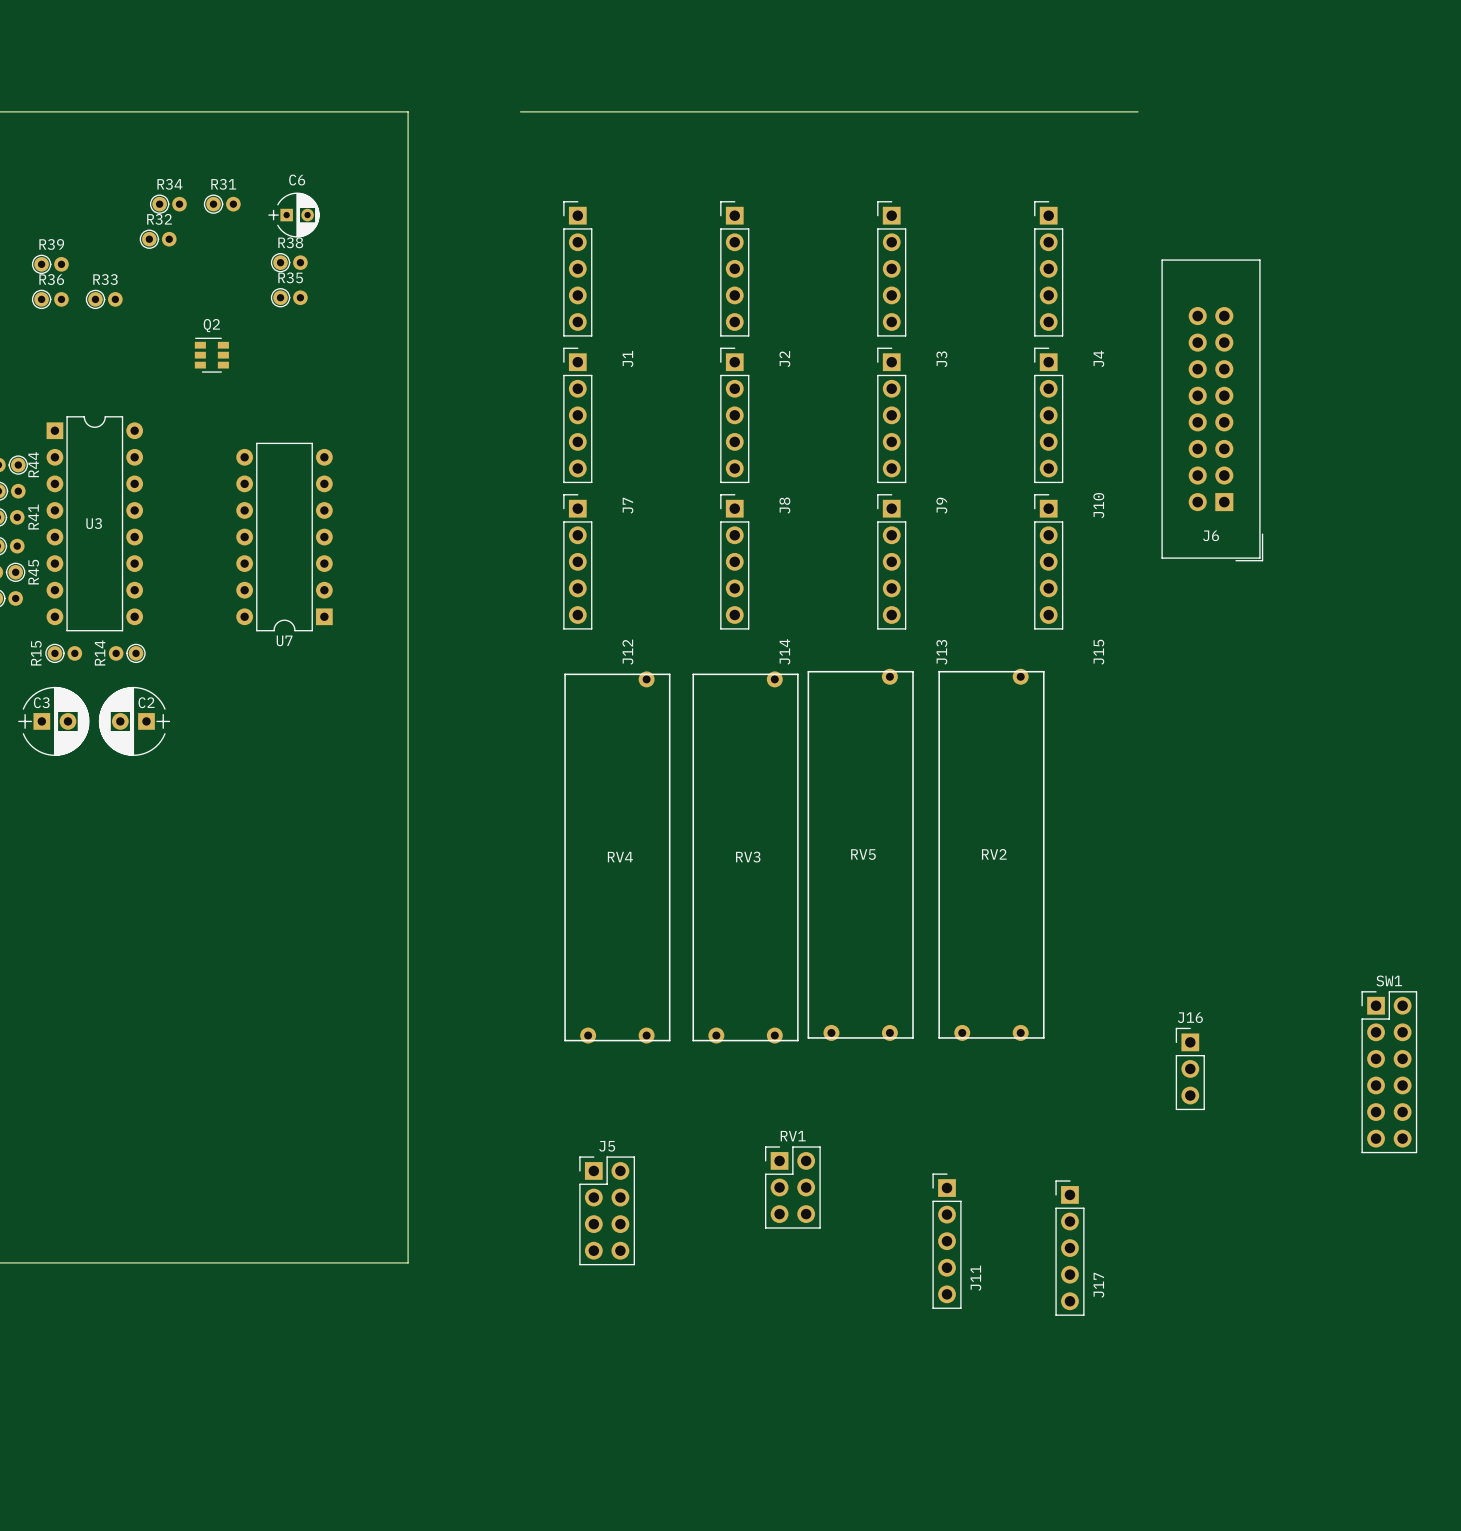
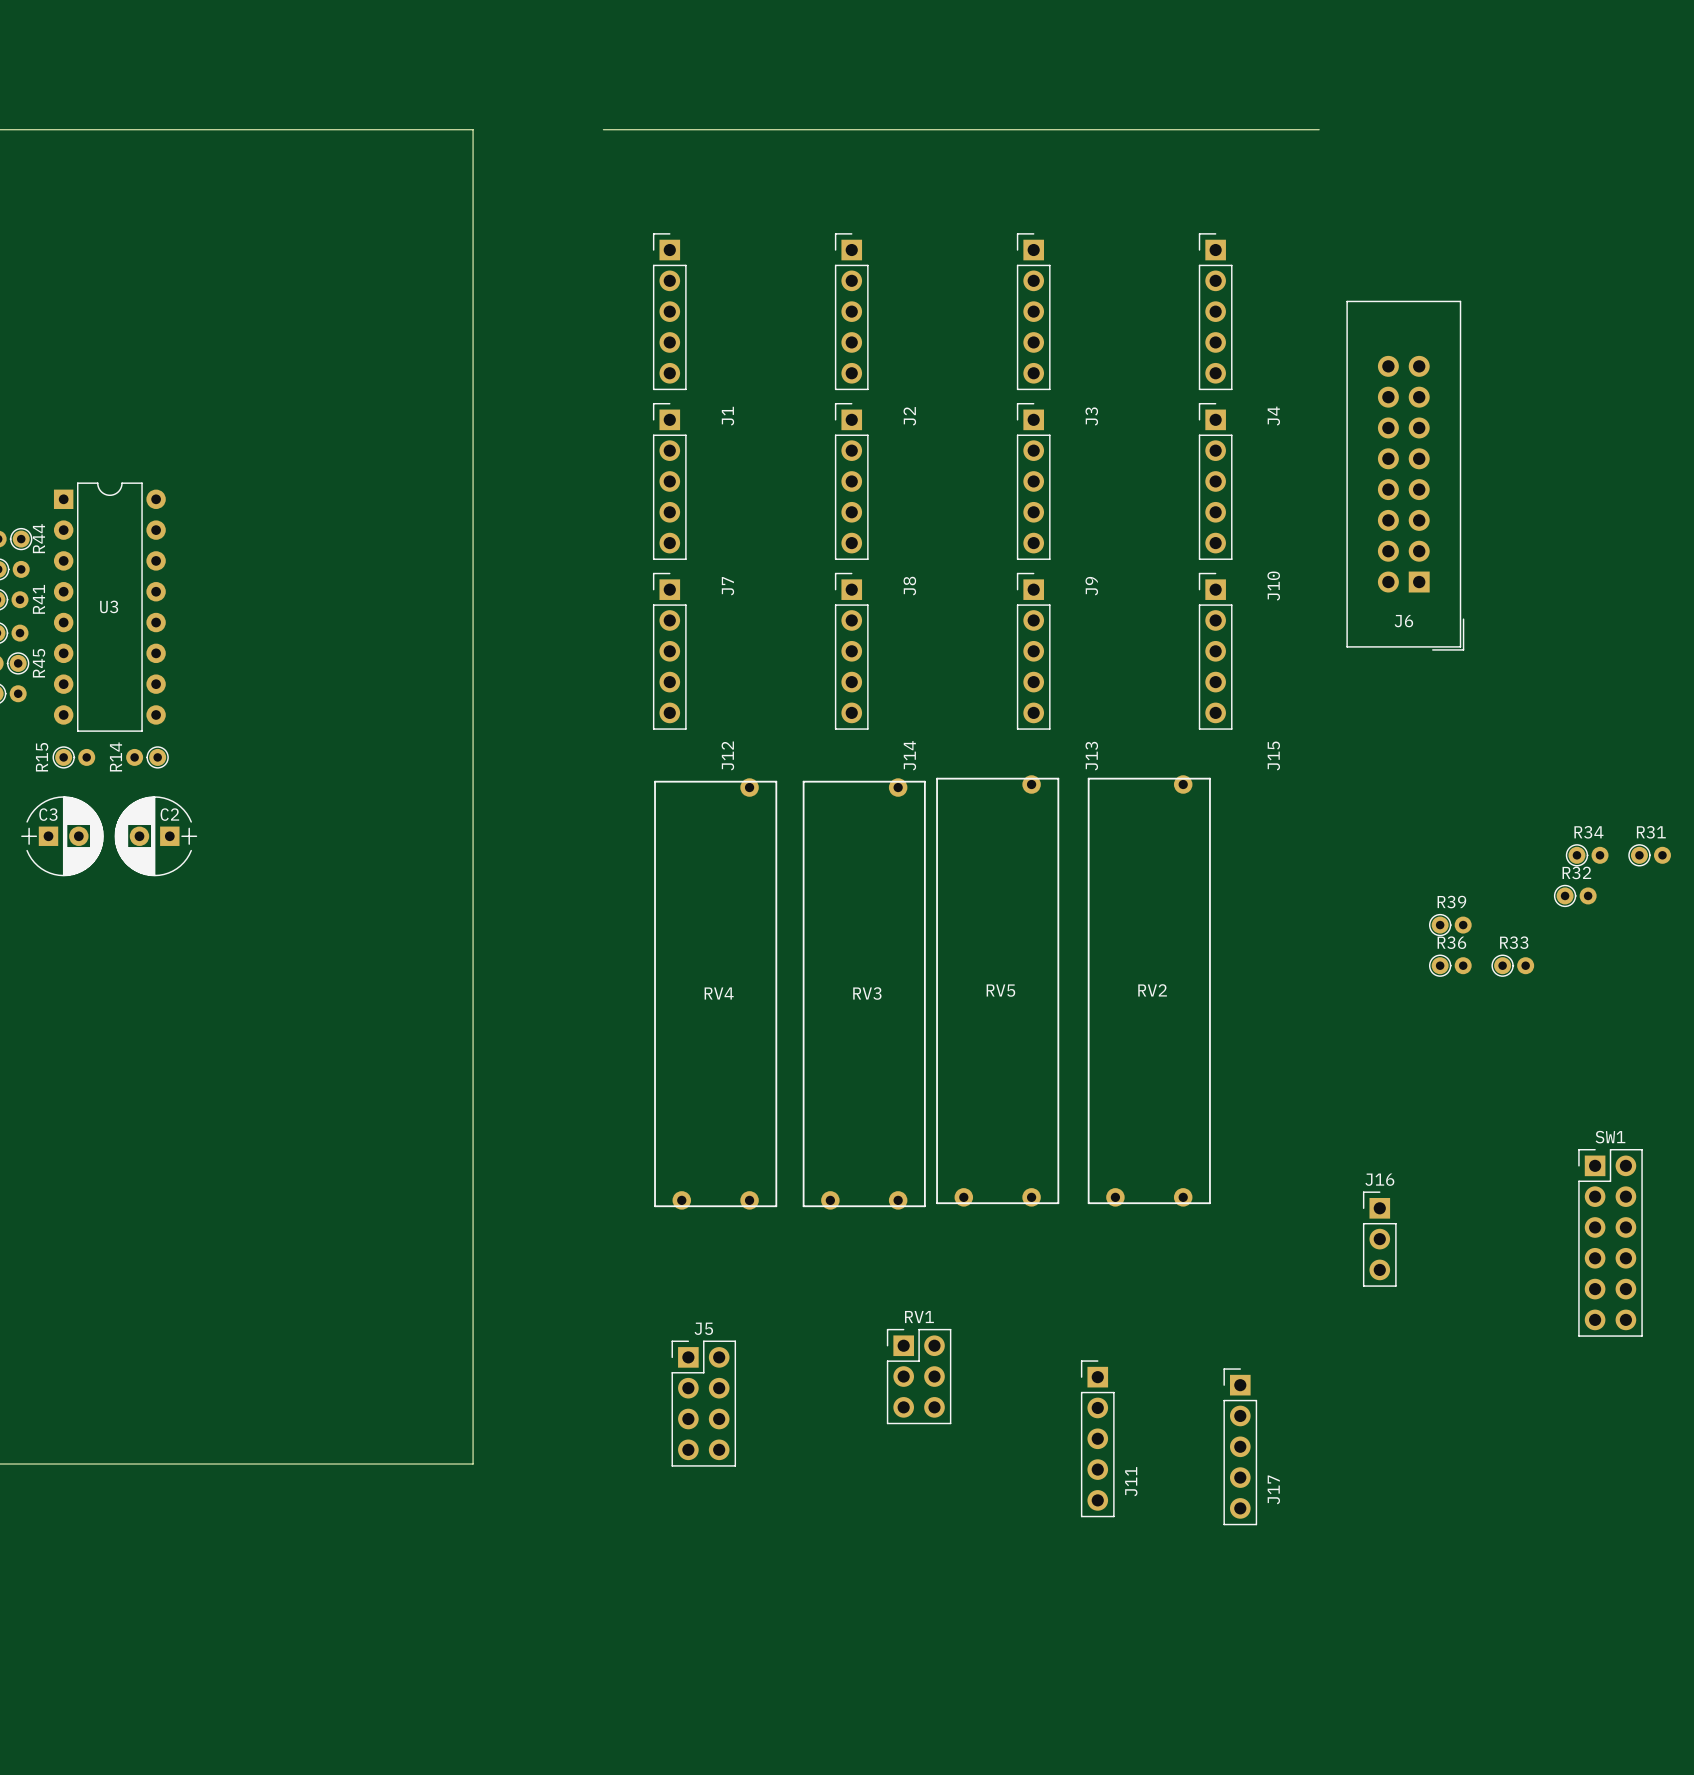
R34 position: (168, 204) -> (1587, 855)
R31 position: (222, 204) -> (1649, 855)
C6: (293, 215) -> none
R32 position: (158, 239) -> (1575, 895)
R38: (289, 262) -> none
R39 position: (50, 264) -> (1450, 925)
R35: (289, 297) -> none
R36 position: (50, 299) -> (1450, 965)
R33 position: (104, 299) -> (1512, 965)
Q2: (211, 355) -> none
U7: (284, 537) -> none

